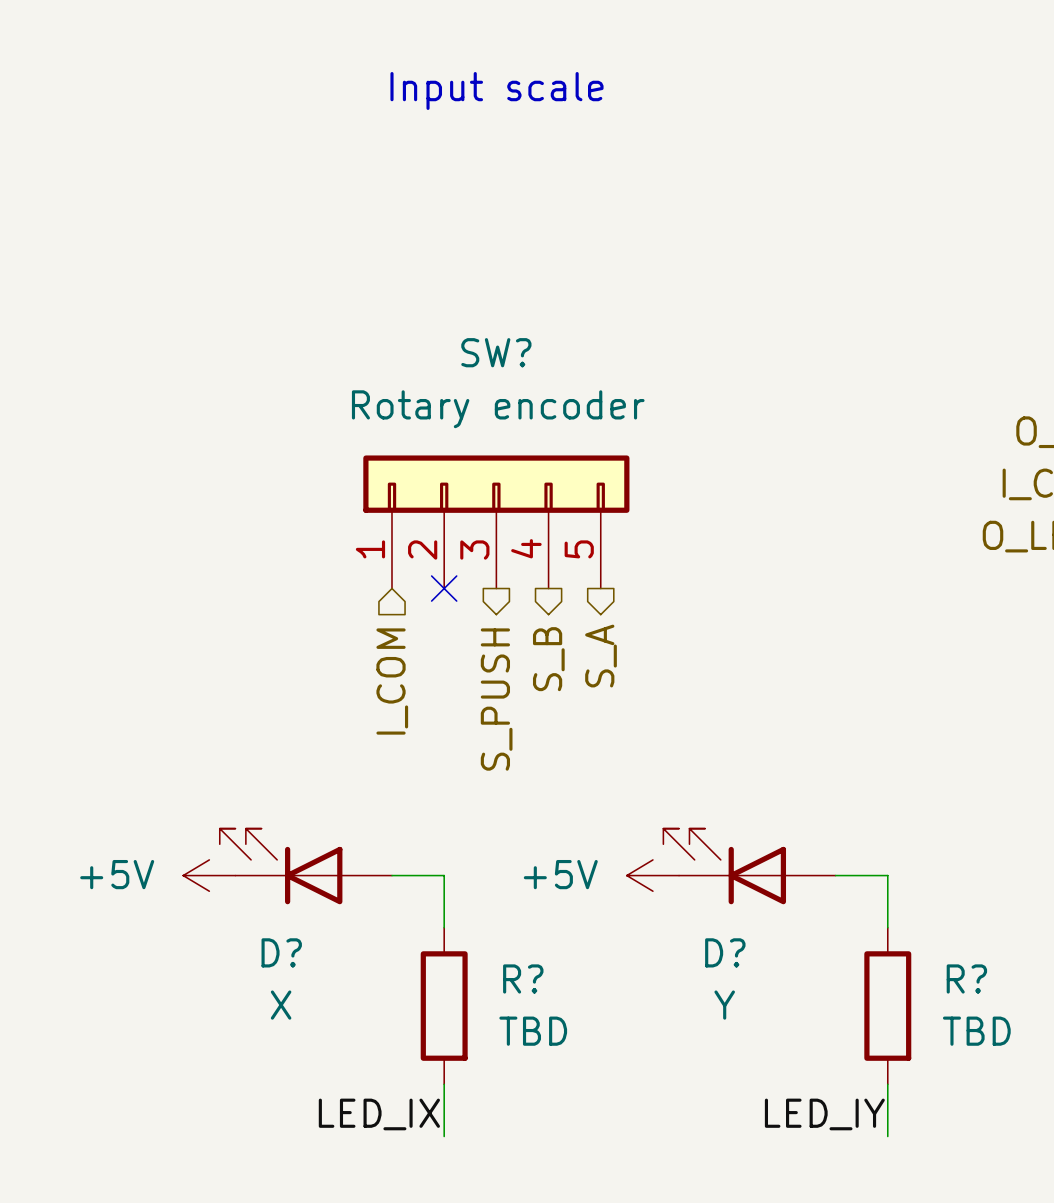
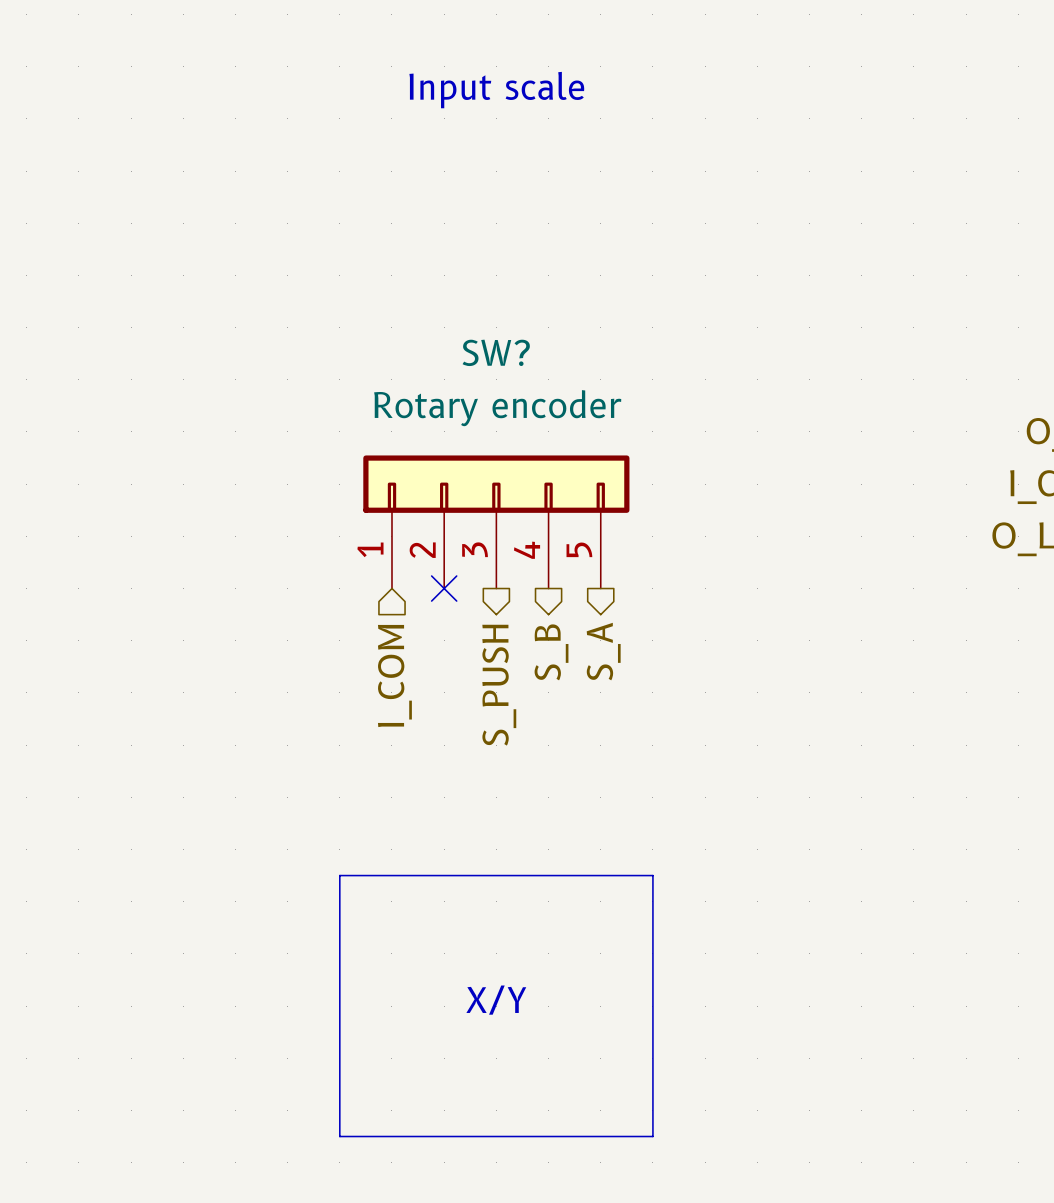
D?: X (305, 866) -> none
D?: Y (749, 866) -> none
power symbol: +5V (209, 875) -> none
line: none -> (339, 875) (652, 875) (652, 1136) (339, 1136) (339, 875)
wire: (391, 875) (444, 875) (444, 927) -> none
power symbol: +5V (652, 875) -> none
wire: (835, 875) (887, 875) (887, 927) -> none
text: none -> X/Y (496, 1000)
R?: TBD (444, 1006) -> none
R?: TBD (887, 1006) -> none
wire: (444, 1084) (444, 1136) -> none
wire: (887, 1084) (887, 1136) -> none
label: LED_IX (379, 1114) -> none
label: LED_IY (824, 1114) -> none

